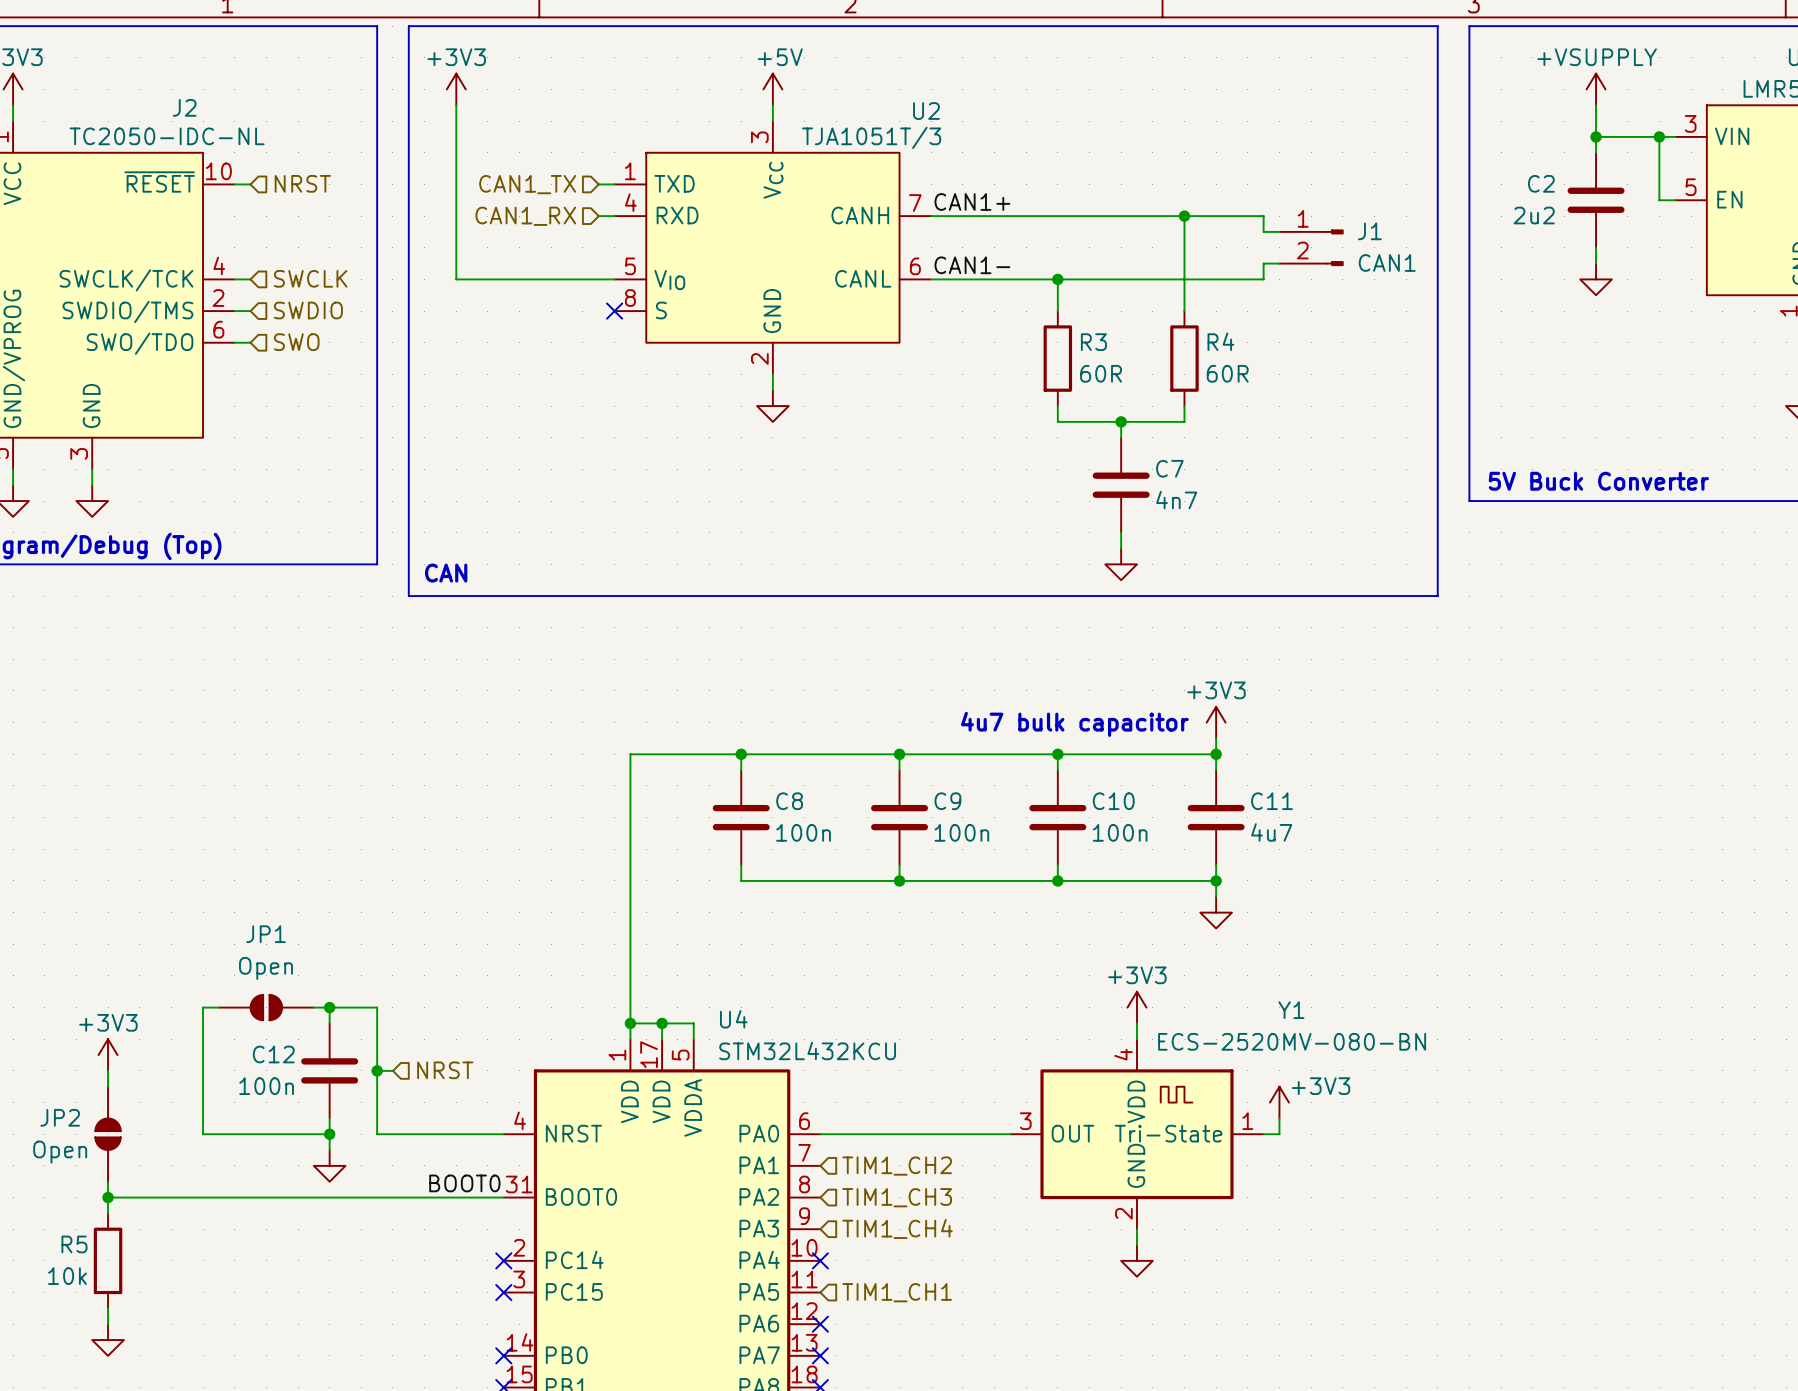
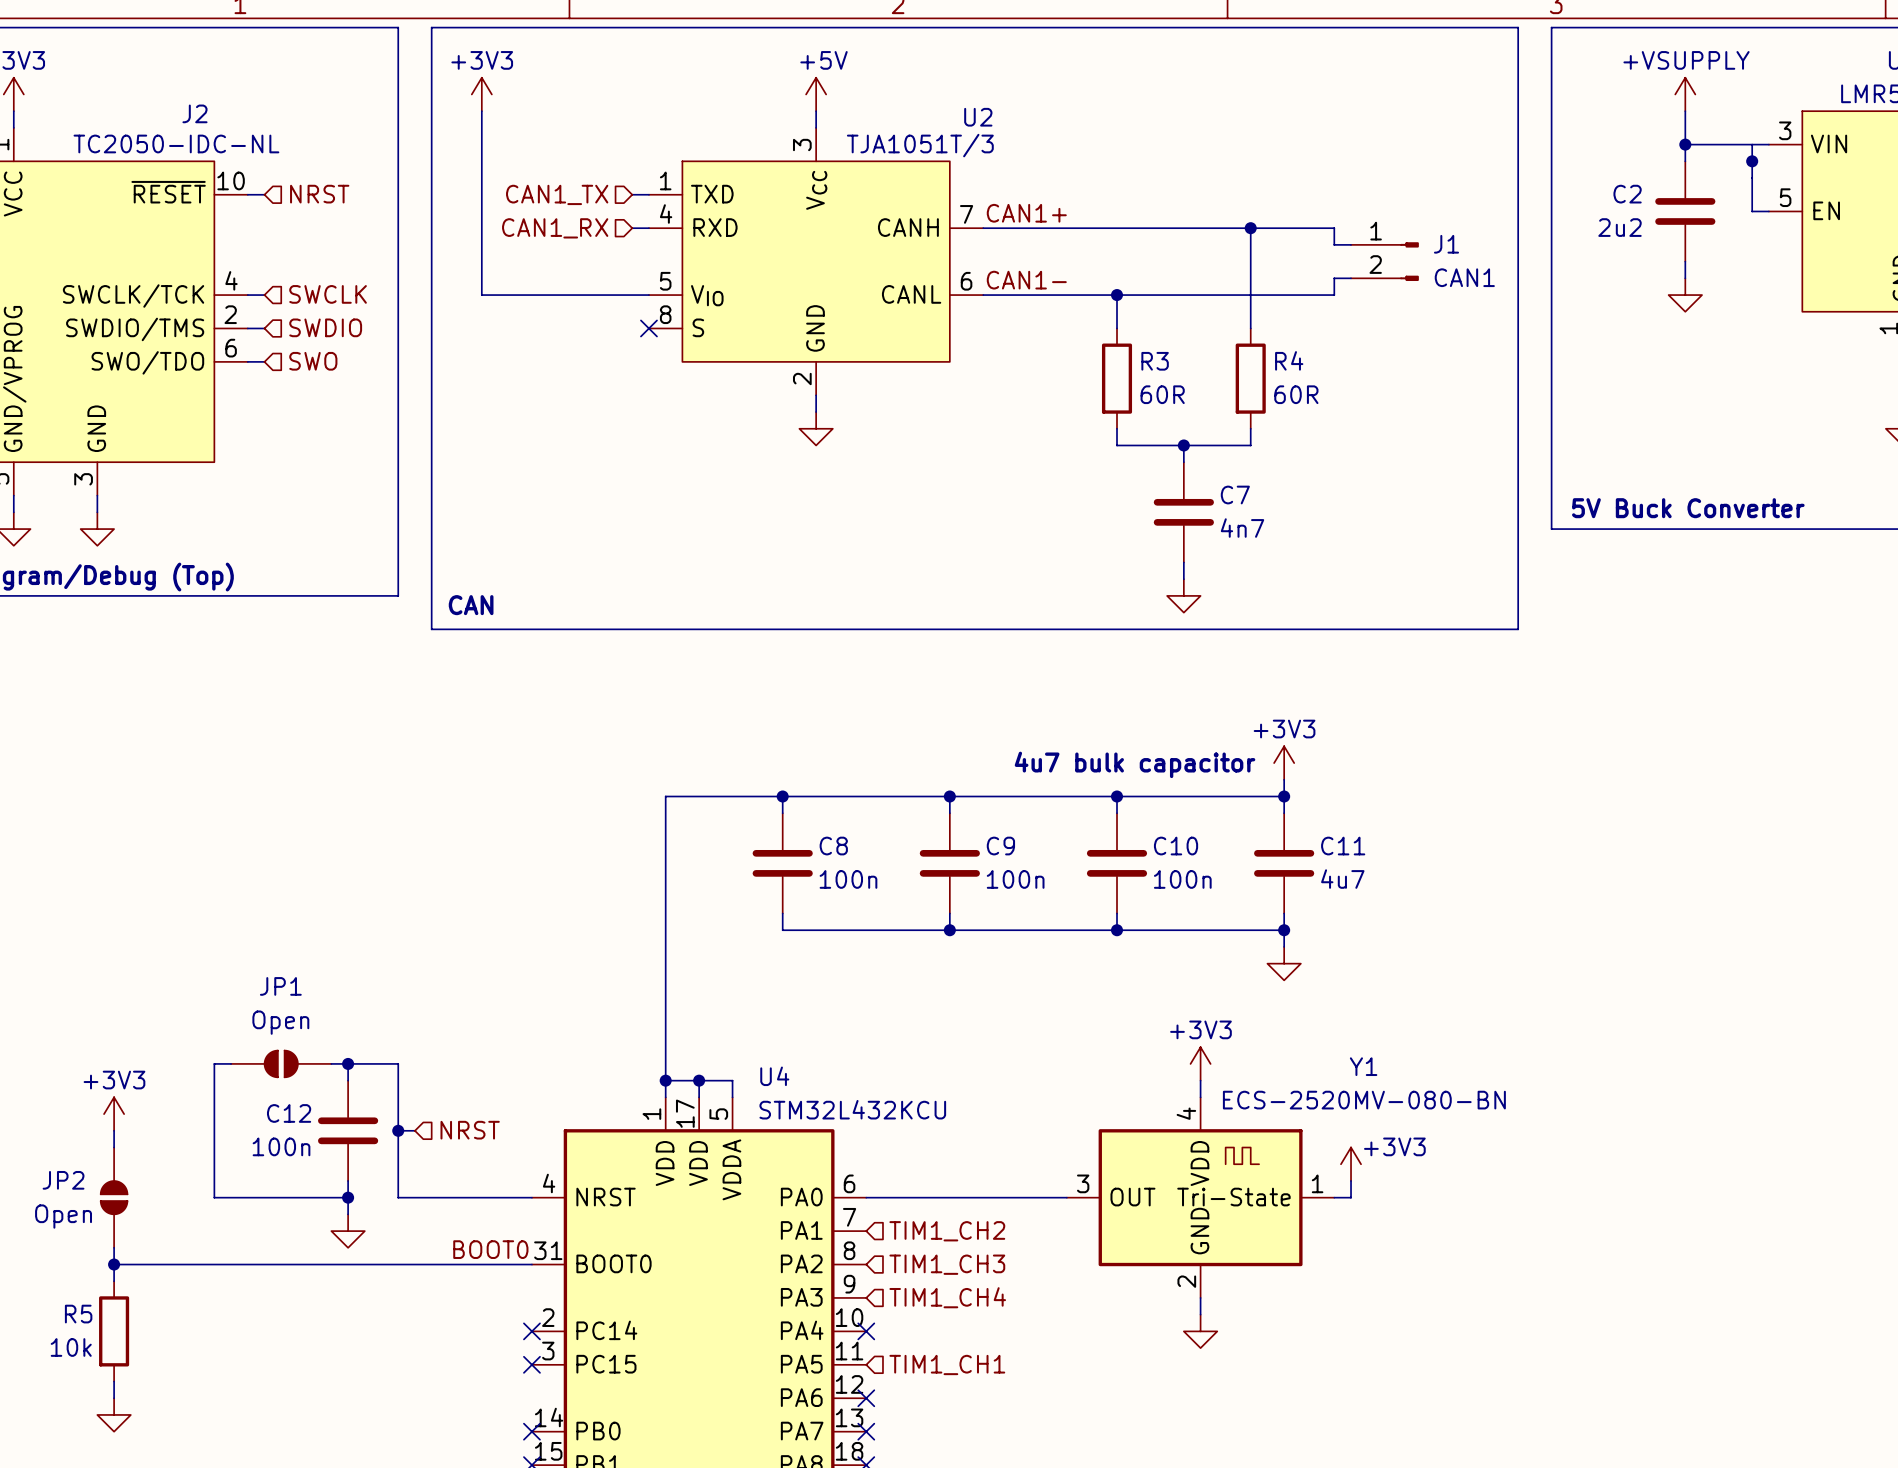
junction position: (1659, 136) -> (1752, 161)

